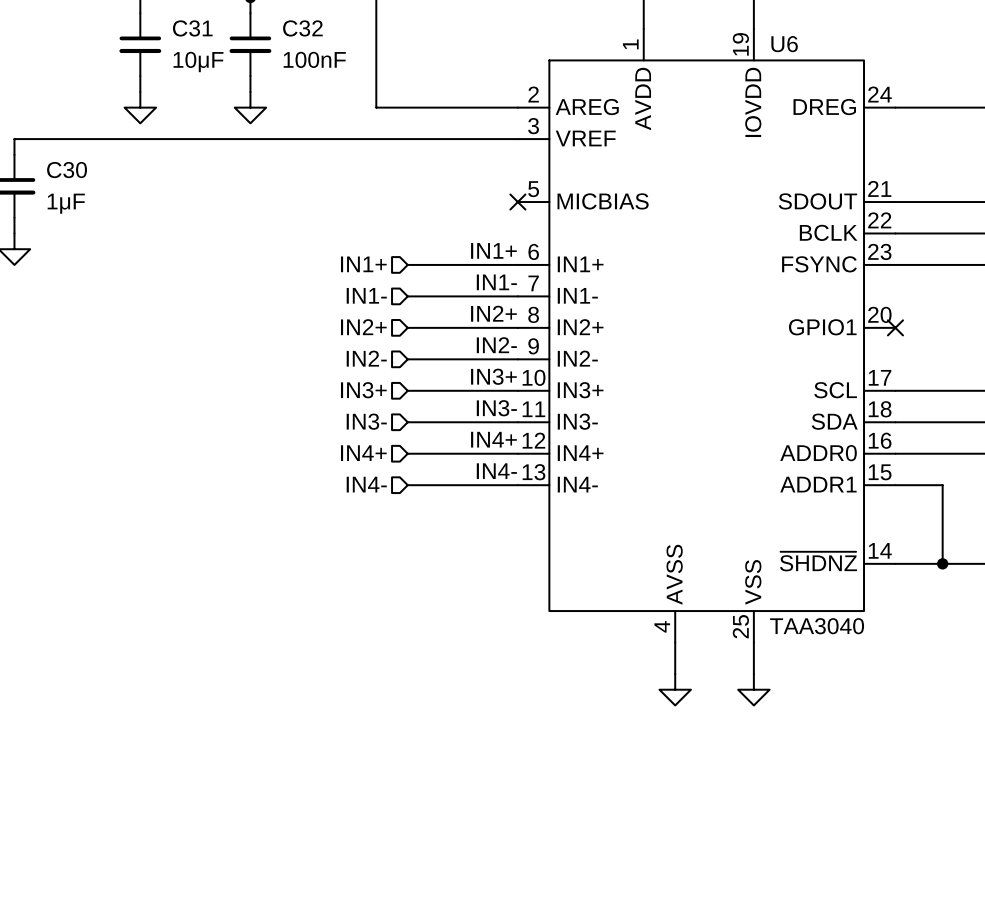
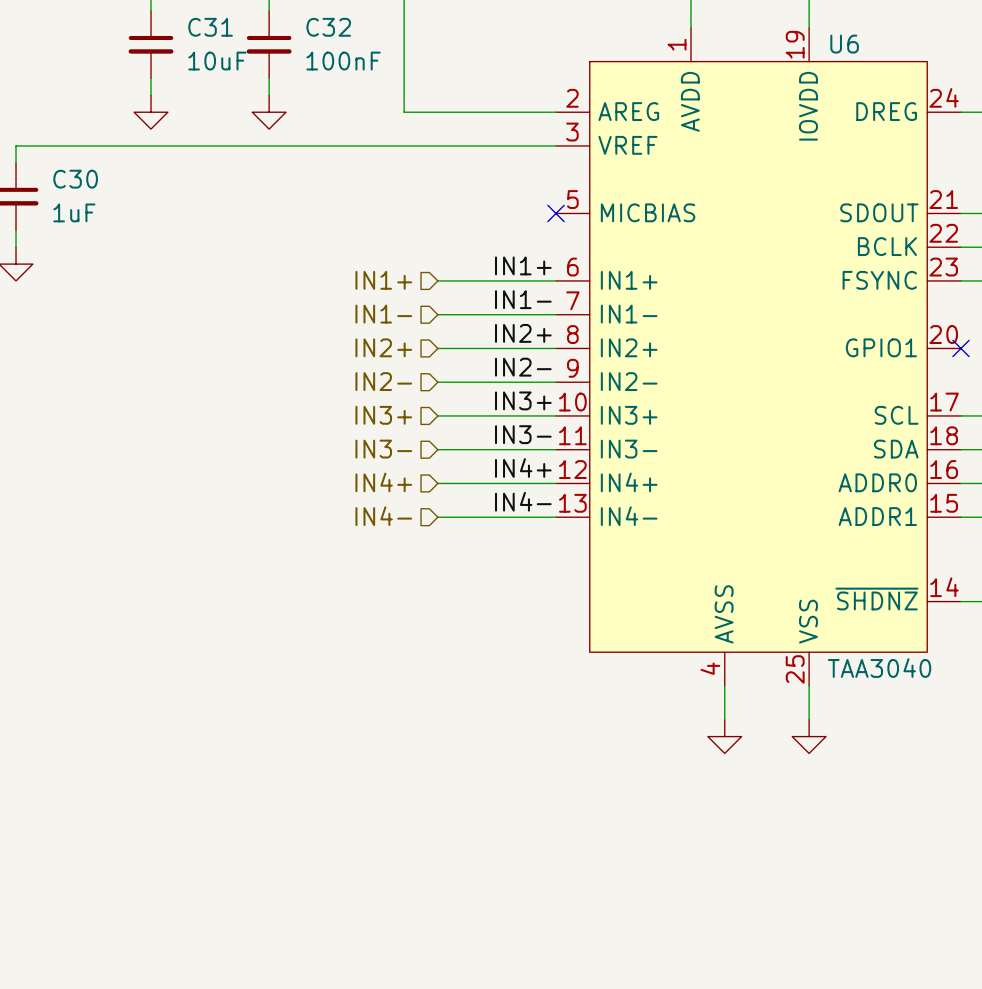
C31 value: 10μF (198, 61) -> 10uF (217, 61)
C30 value: 1μF (66, 203) -> 1uF (74, 212)

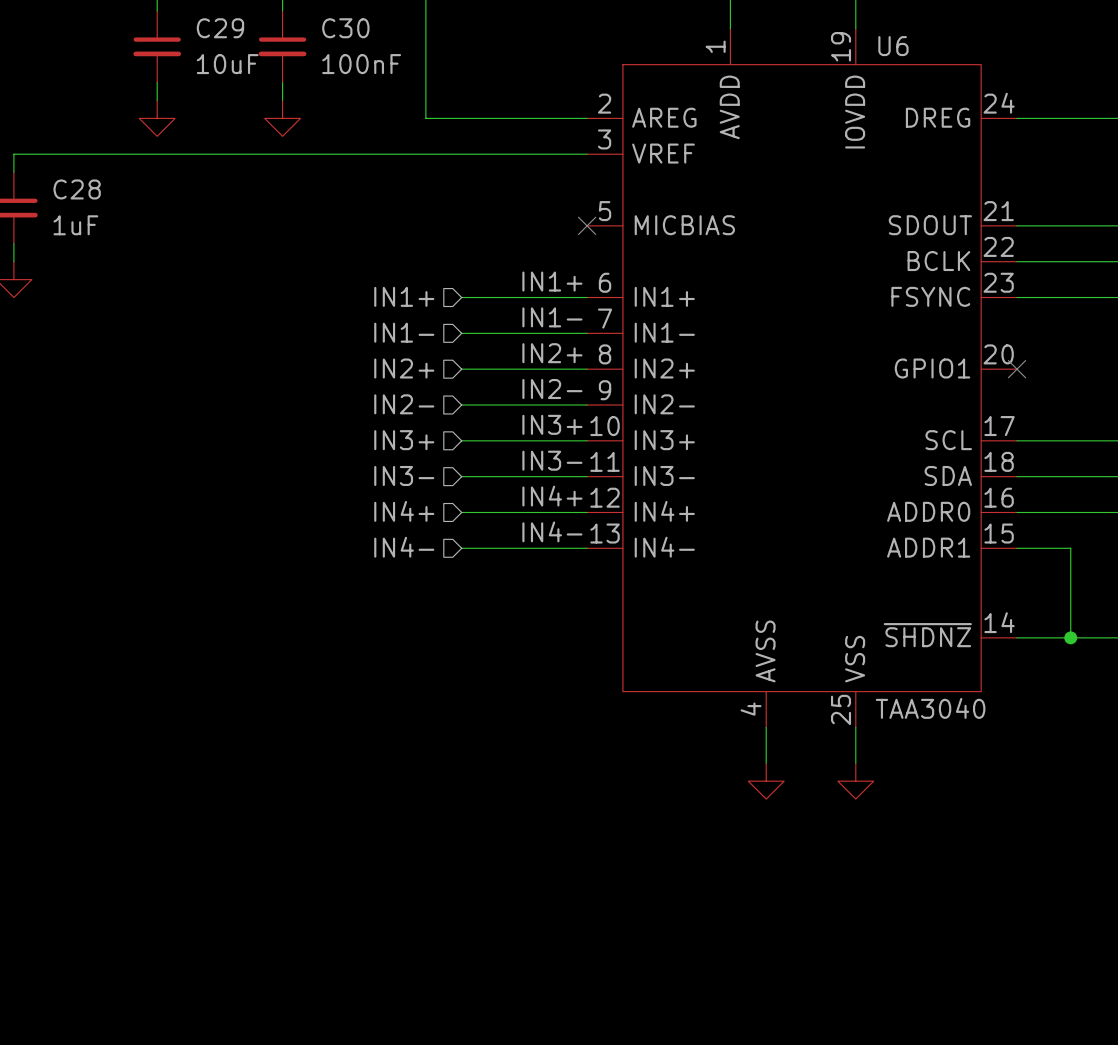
C31 name: C31 (210, 27) -> C29 (220, 28)
C32 name: C32 (328, 27) -> C30 (345, 28)
C30 name: C30 (75, 179) -> C28 (77, 189)

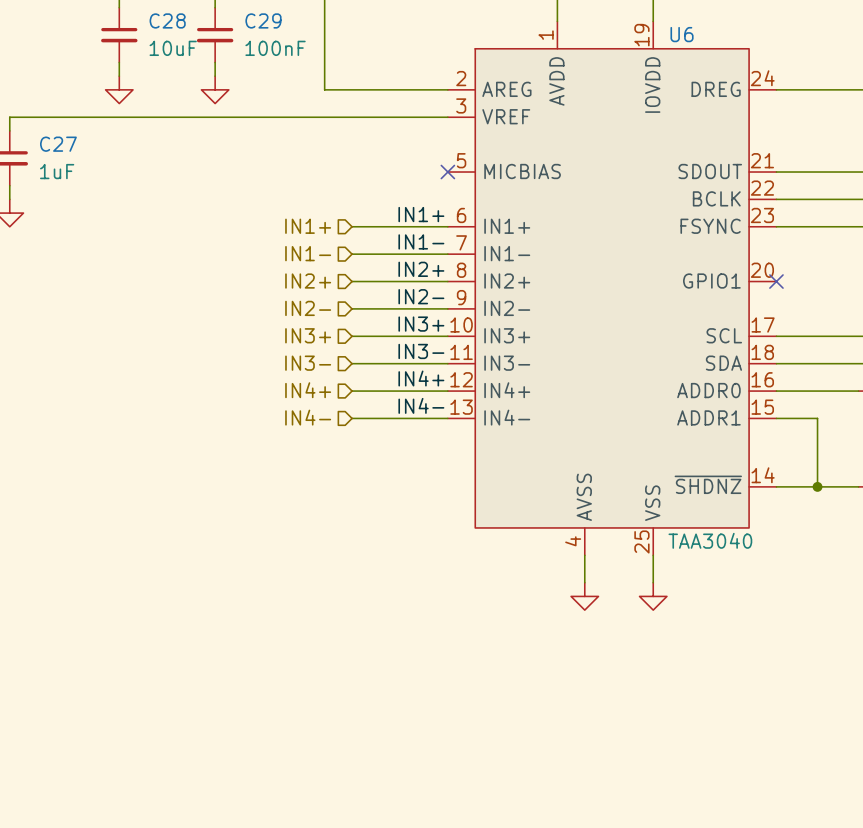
C29 name: C29 (220, 28) -> C28 (167, 20)
C30 name: C30 (345, 28) -> C29 (263, 20)
C28 name: C28 (77, 189) -> C27 (58, 144)

